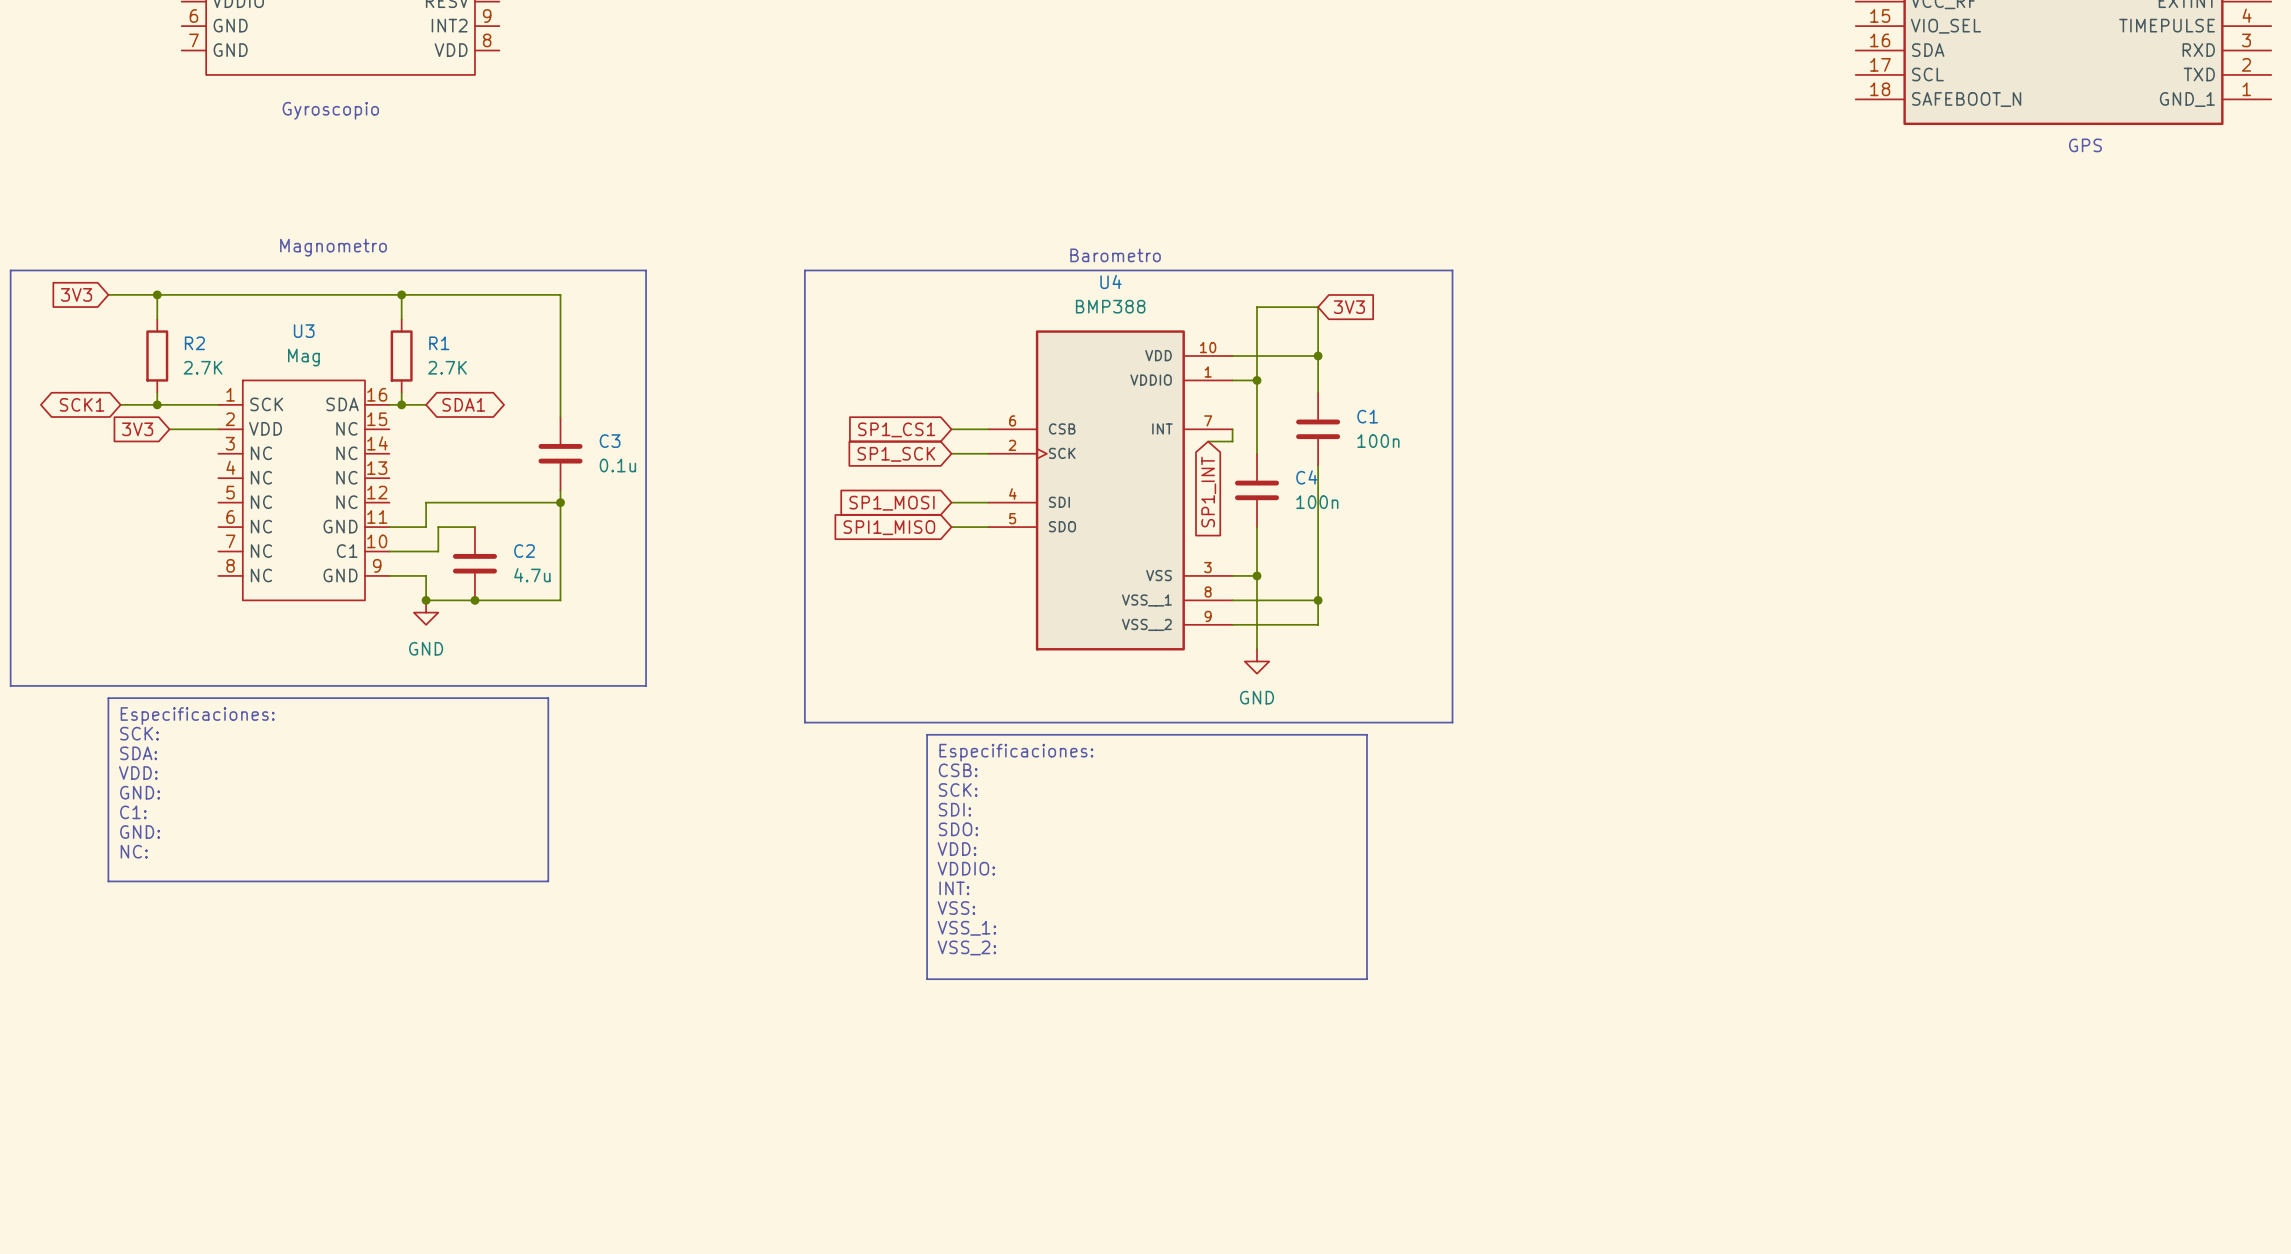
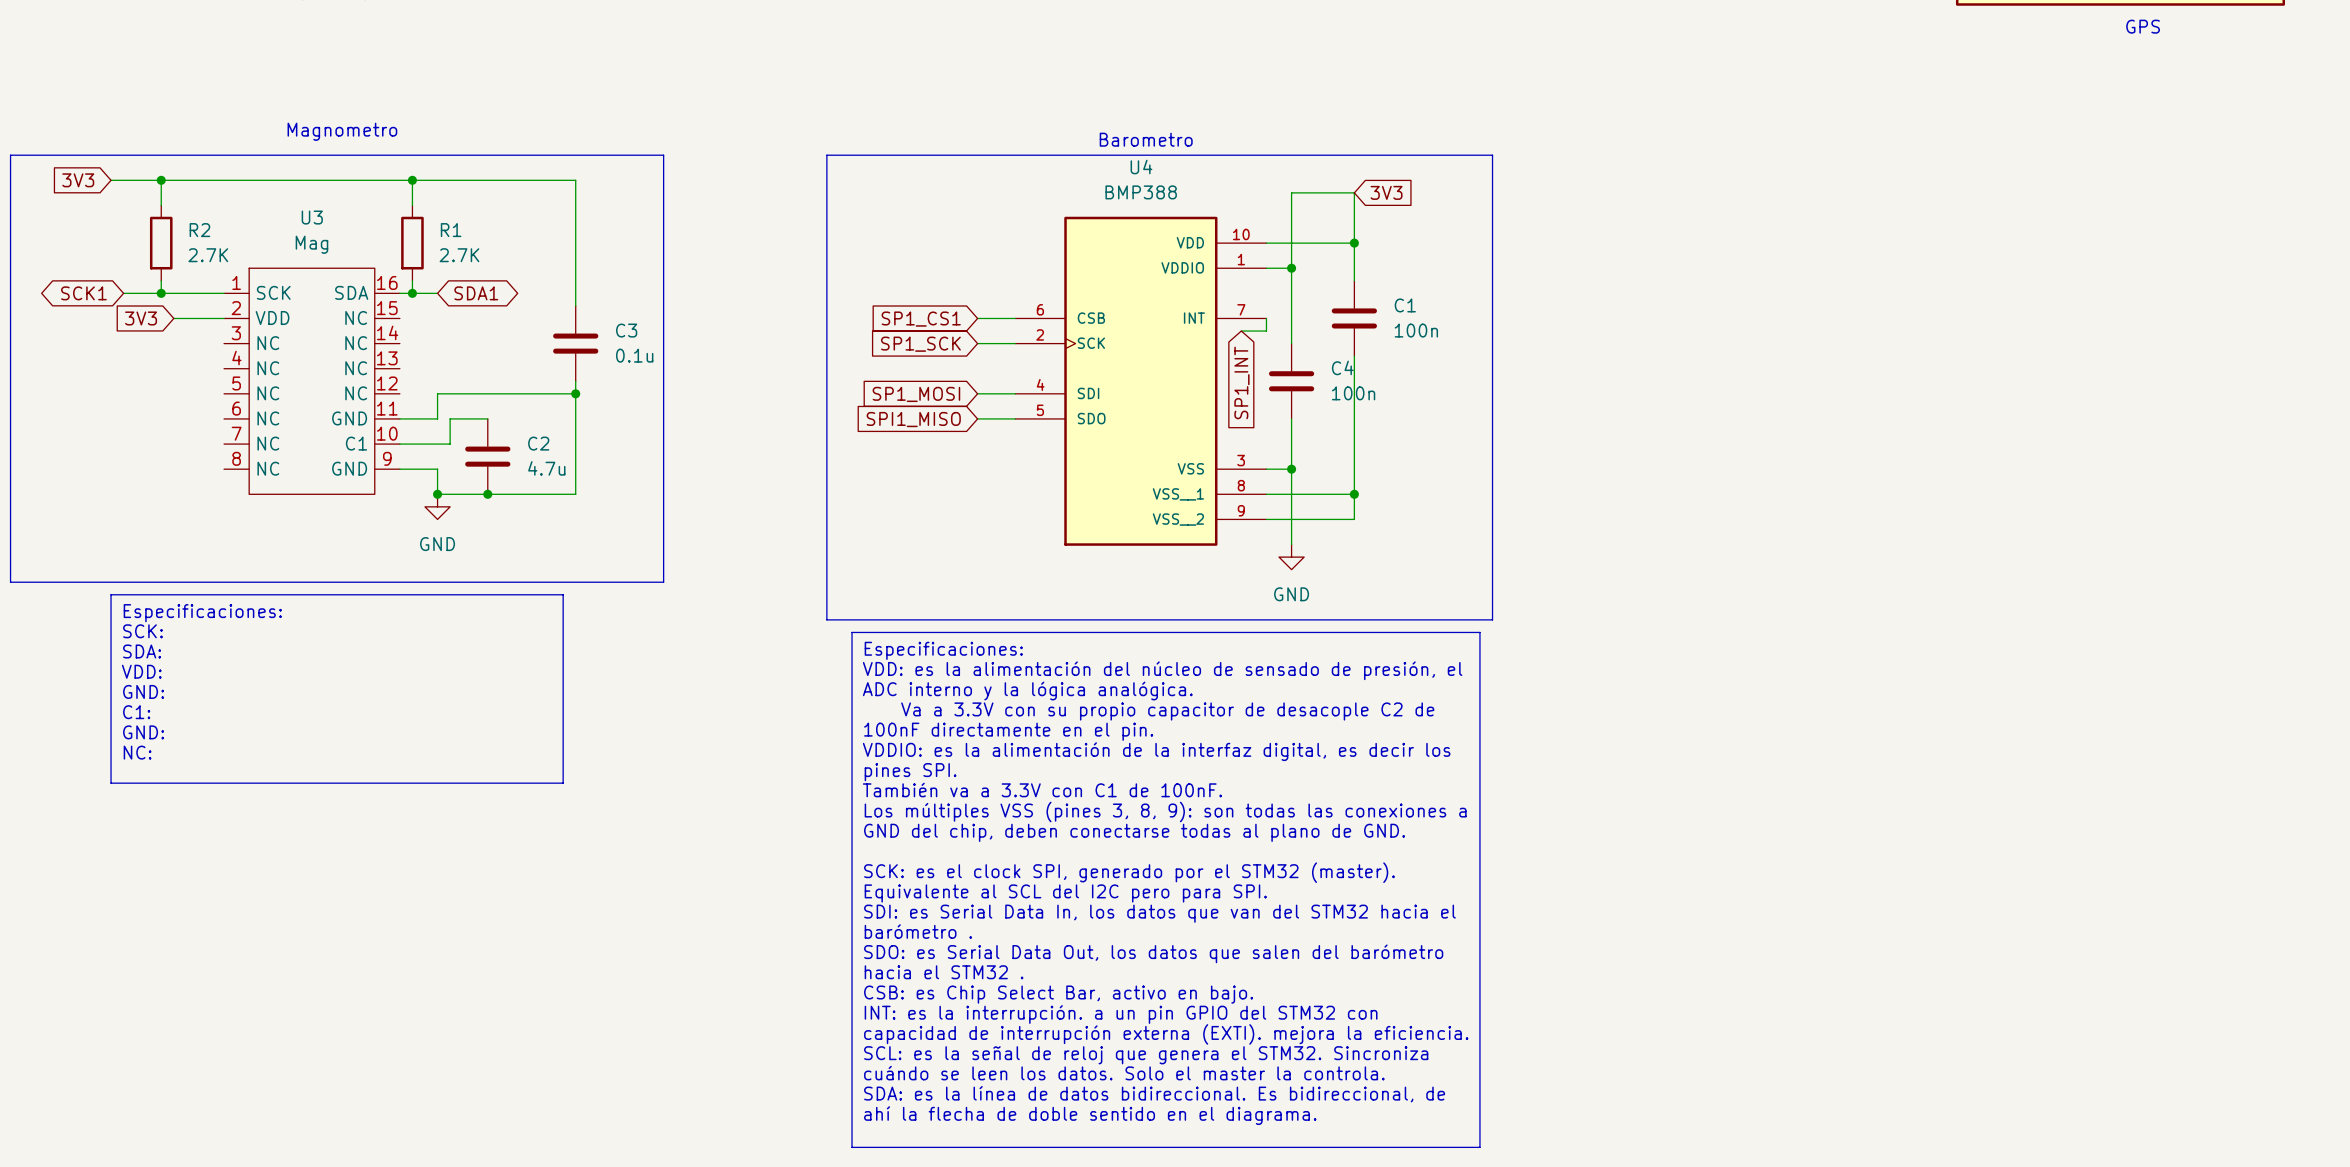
line: (927, 734) (927, 979) (1366, 979) (1366, 734) -> (952, 632) (852, 632) (852, 1147) (1479, 1147) (1479, 632) (1404, 632)
text position: Especificaciones: (1016, 752) -> Especificaciones: (943, 650)
text: CSB: (958, 770) -> none
text: none -> VDD: es la alimentación del núcleo de sensado de presión, el (1162, 670)
text: SCK: (958, 790) -> none
text: none -> ADC interno y la lógica analógica. (1027, 690)
text: SDI: (954, 809) -> none
text: none -> Va a 3.3V con su propio capacitor de desacople C2 de (1167, 711)
text: SDO: (958, 829) -> none
text: none -> 100nF directamente en el pin. (1008, 731)
text: VDD: (957, 849) -> none
text: none -> VDDIO: es la alimentación de la interfaz digital, es decir los (1156, 751)
text: VDDIO: (966, 868) -> none
text: none -> pines SPI. (910, 772)
text: INT: (954, 888) -> none
text: none -> También va a 3.3V con C1 de 100nF. (1042, 789)
text: VSS: (956, 908) -> none
text: none -> Los múltiples VSS (pines 3, 8, 9): son todas las conexiones a (1165, 812)
text: VSS_1: (966, 928) -> none
text: none -> GND del chip, deben conectarse todas al plano de GND. (1134, 832)
text: VSS_2: (966, 947) -> none
text: none -> SCK: es el clock SPI, generado por el STM32 (master). (1129, 872)
text: none -> Equivalente al SCL del I2C pero para SPI. (1065, 893)
text: none -> SDI: es Serial Data In, los datos que van del STM32 hacia el (1159, 913)
text: none -> barómetro . (918, 931)
text: none -> SDO: es Serial Data Out, los datos que salen del barómetro (1153, 953)
text: none -> hacia el STM32 . (944, 972)
text: none -> CSB: es Chip Select Bar, activo en bajo. (1058, 994)
text: none -> INT: es la interrupción. a un pin GPIO del STM32 con (1121, 1014)
text: none -> capacidad de interrupción externa (EXTI). mejora la eficiencia. (1166, 1034)
text: none -> SCL: es la señal de reloj que genera el STM32. Sincroniza (1146, 1055)
text: none -> cuándo se leen los datos. Solo el master la controla. (1124, 1073)
text: none -> SDA: es la línea de datos bidireccional. Es bidireccional, de (1154, 1094)
text: none -> ahí la flecha de doble sentido en el diagrama. (1090, 1115)

